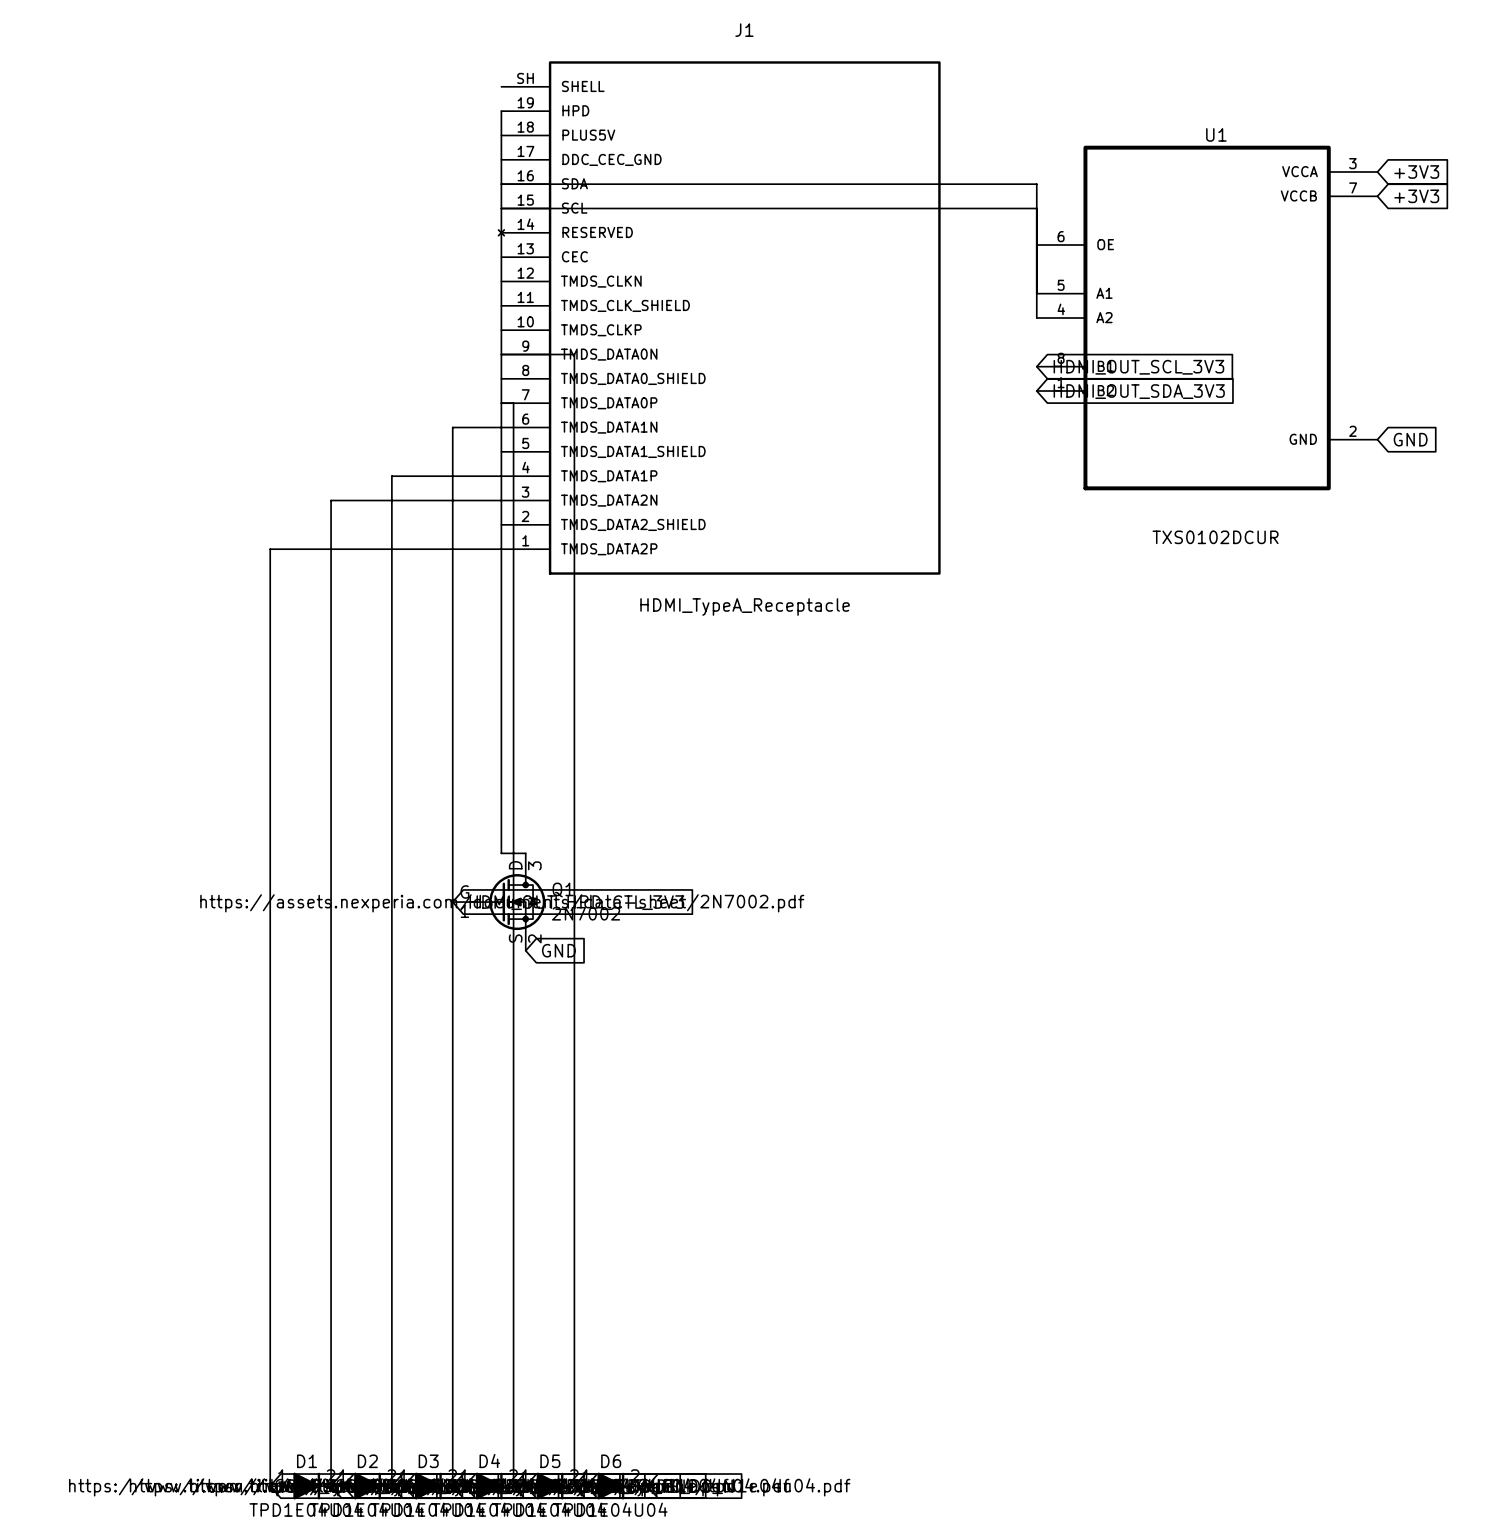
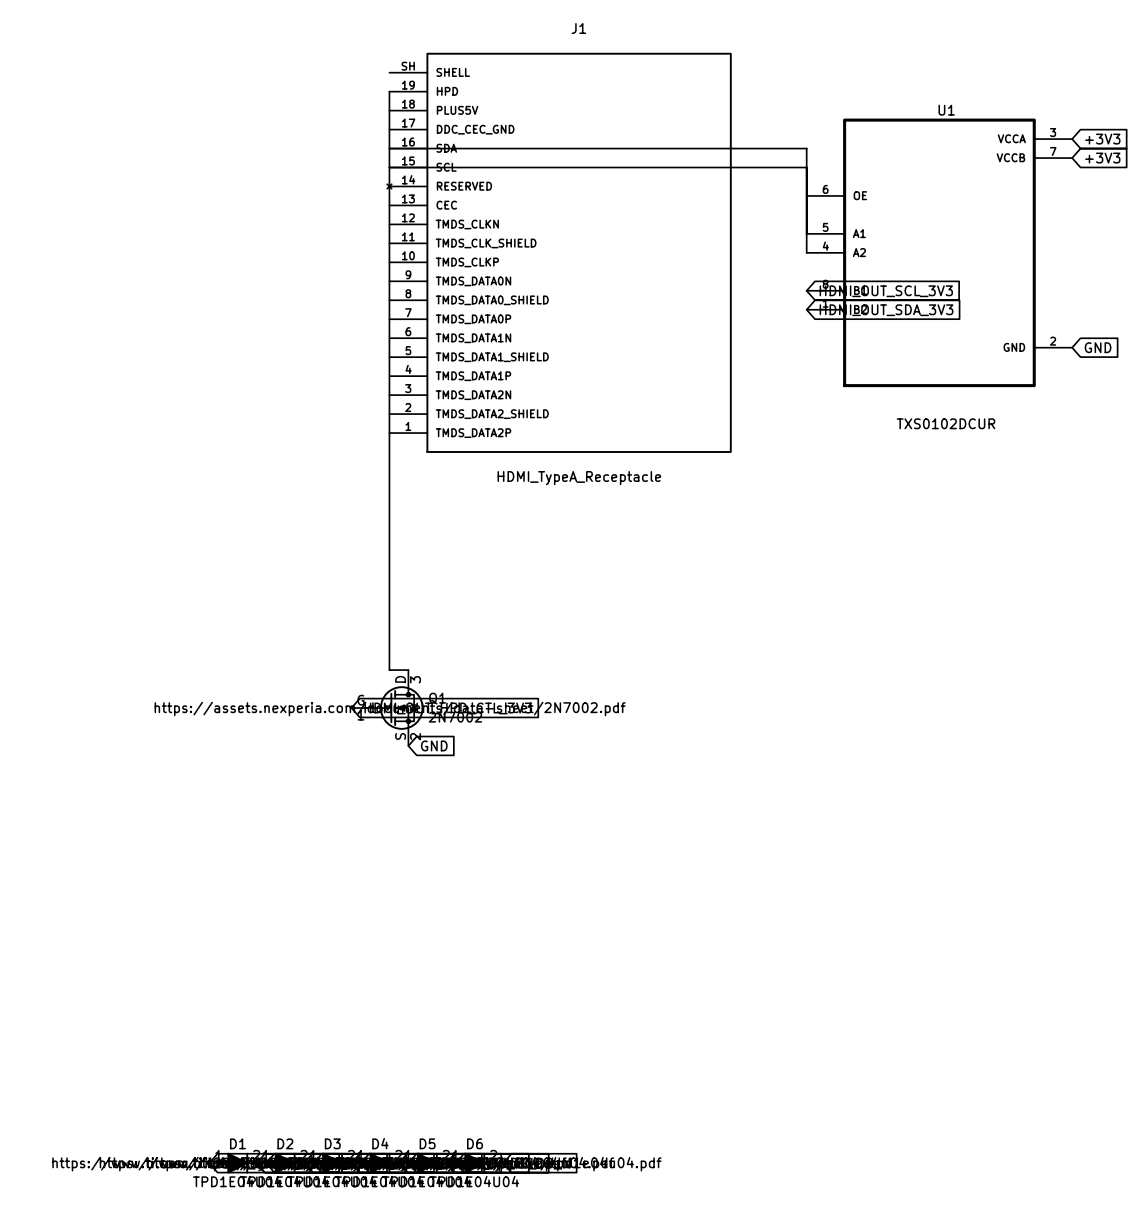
wire: (501, 354) (574, 354) (574, 1486) -> none
wire: (501, 403) (513, 403) (513, 1486) -> none
wire: (501, 427) (452, 427) (452, 1486) -> none
wire: (501, 476) (391, 476) (391, 1486) -> none
wire: (501, 500) (331, 500) (331, 1486) -> none
wire: (501, 549) (270, 549) (270, 1486) -> none

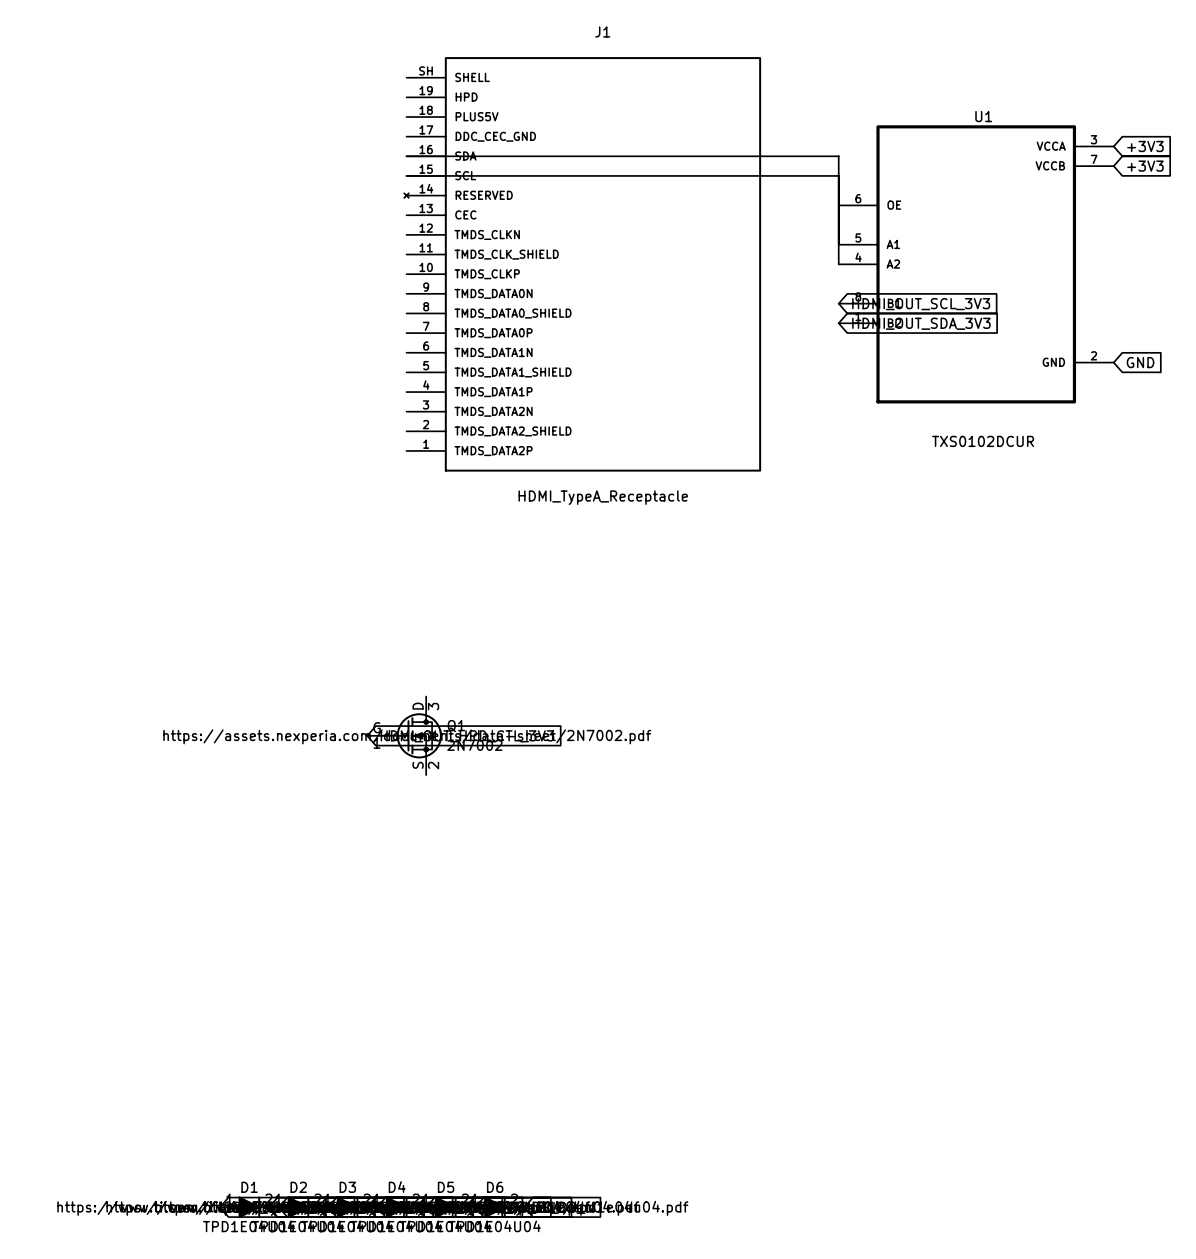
wire: (389, 91) (389, 670) (408, 670) -> none
global label: GND (434, 745) -> none

